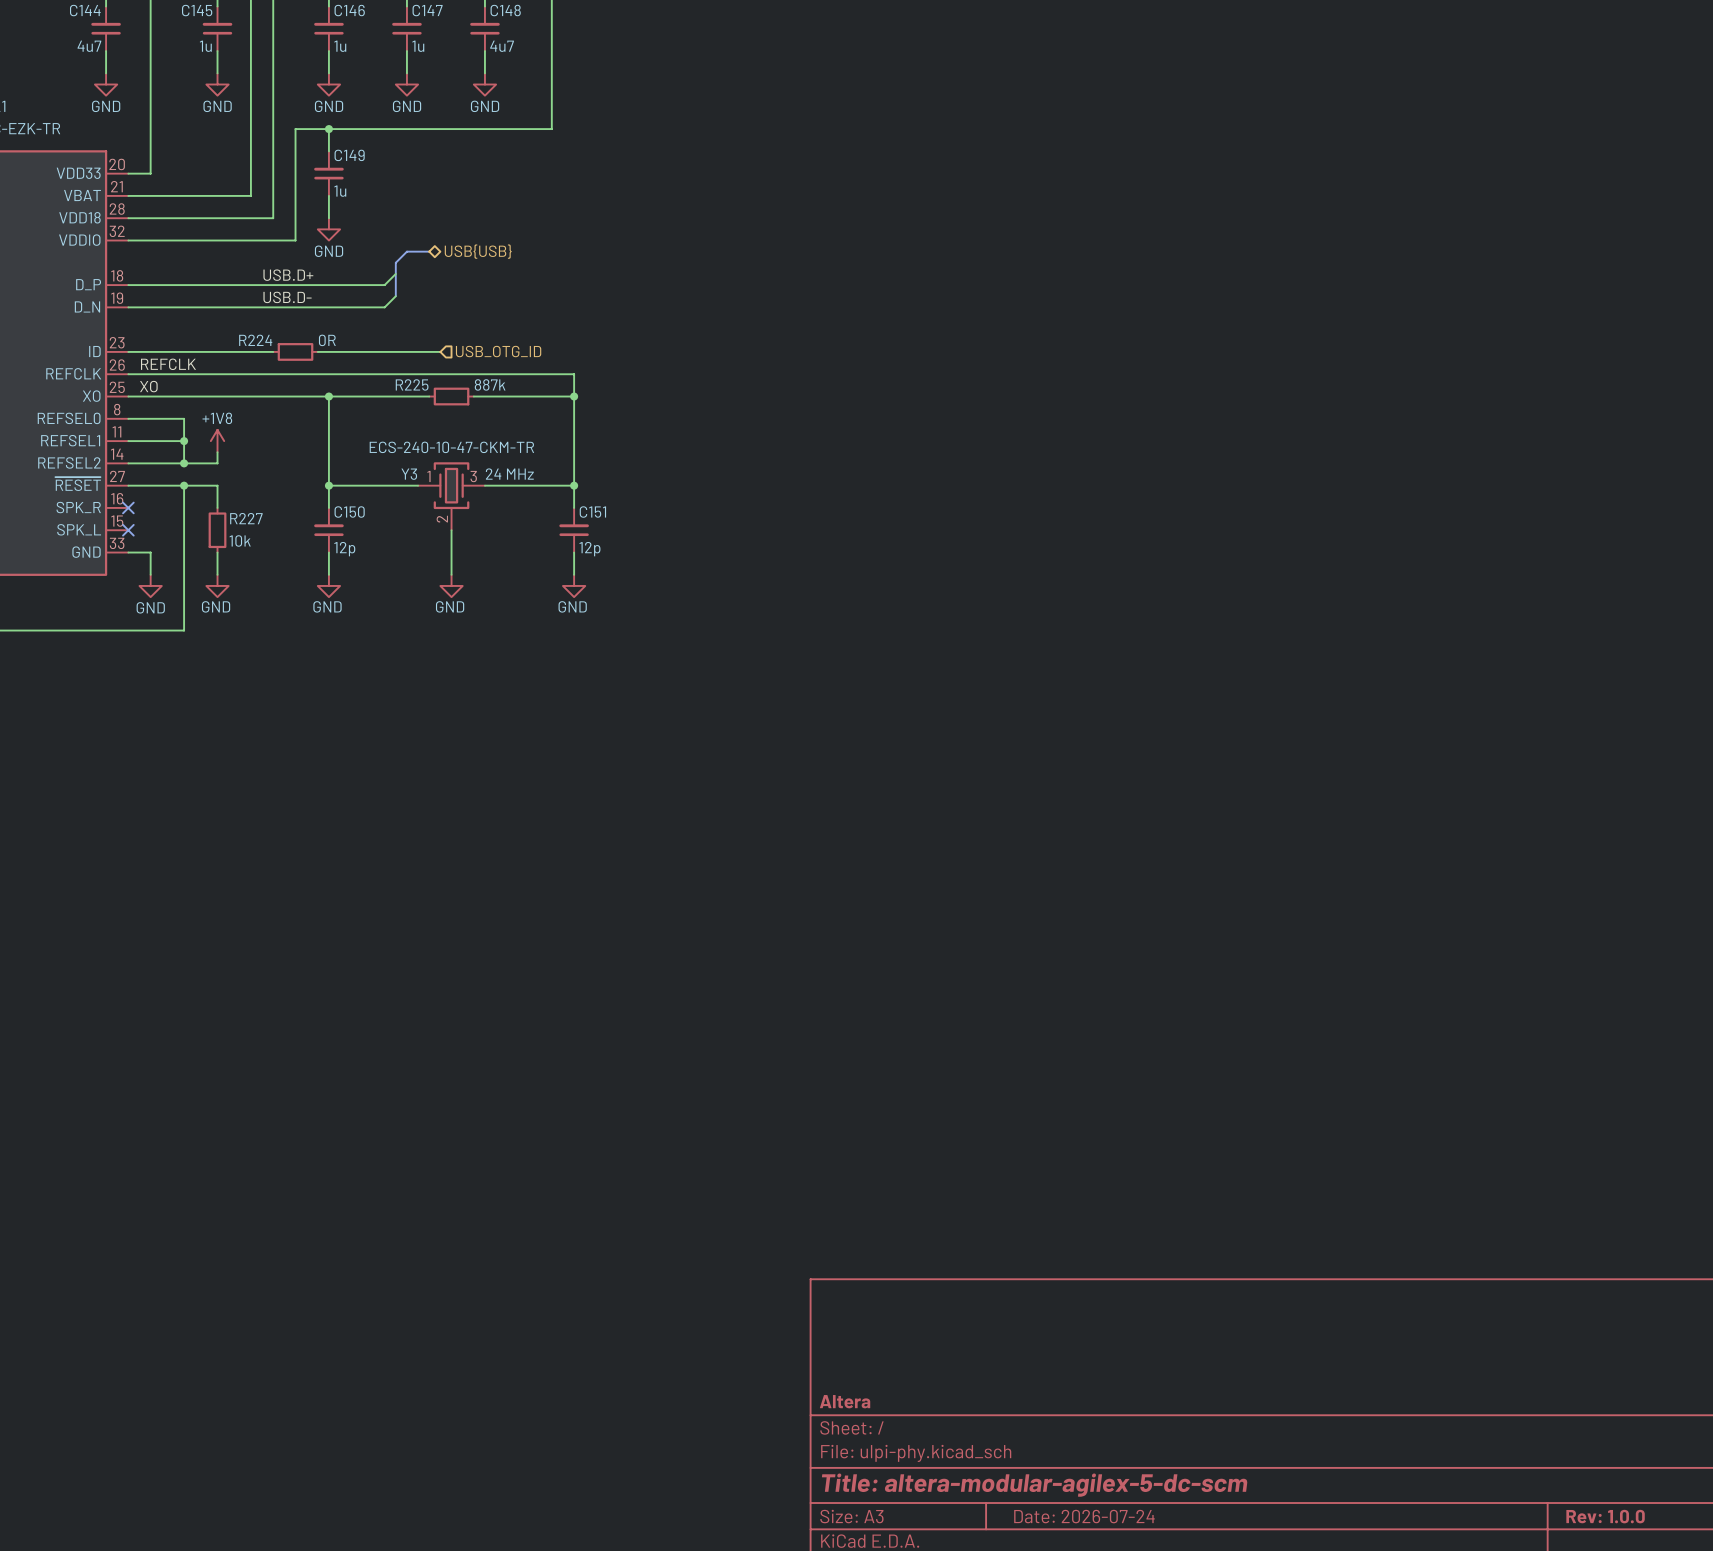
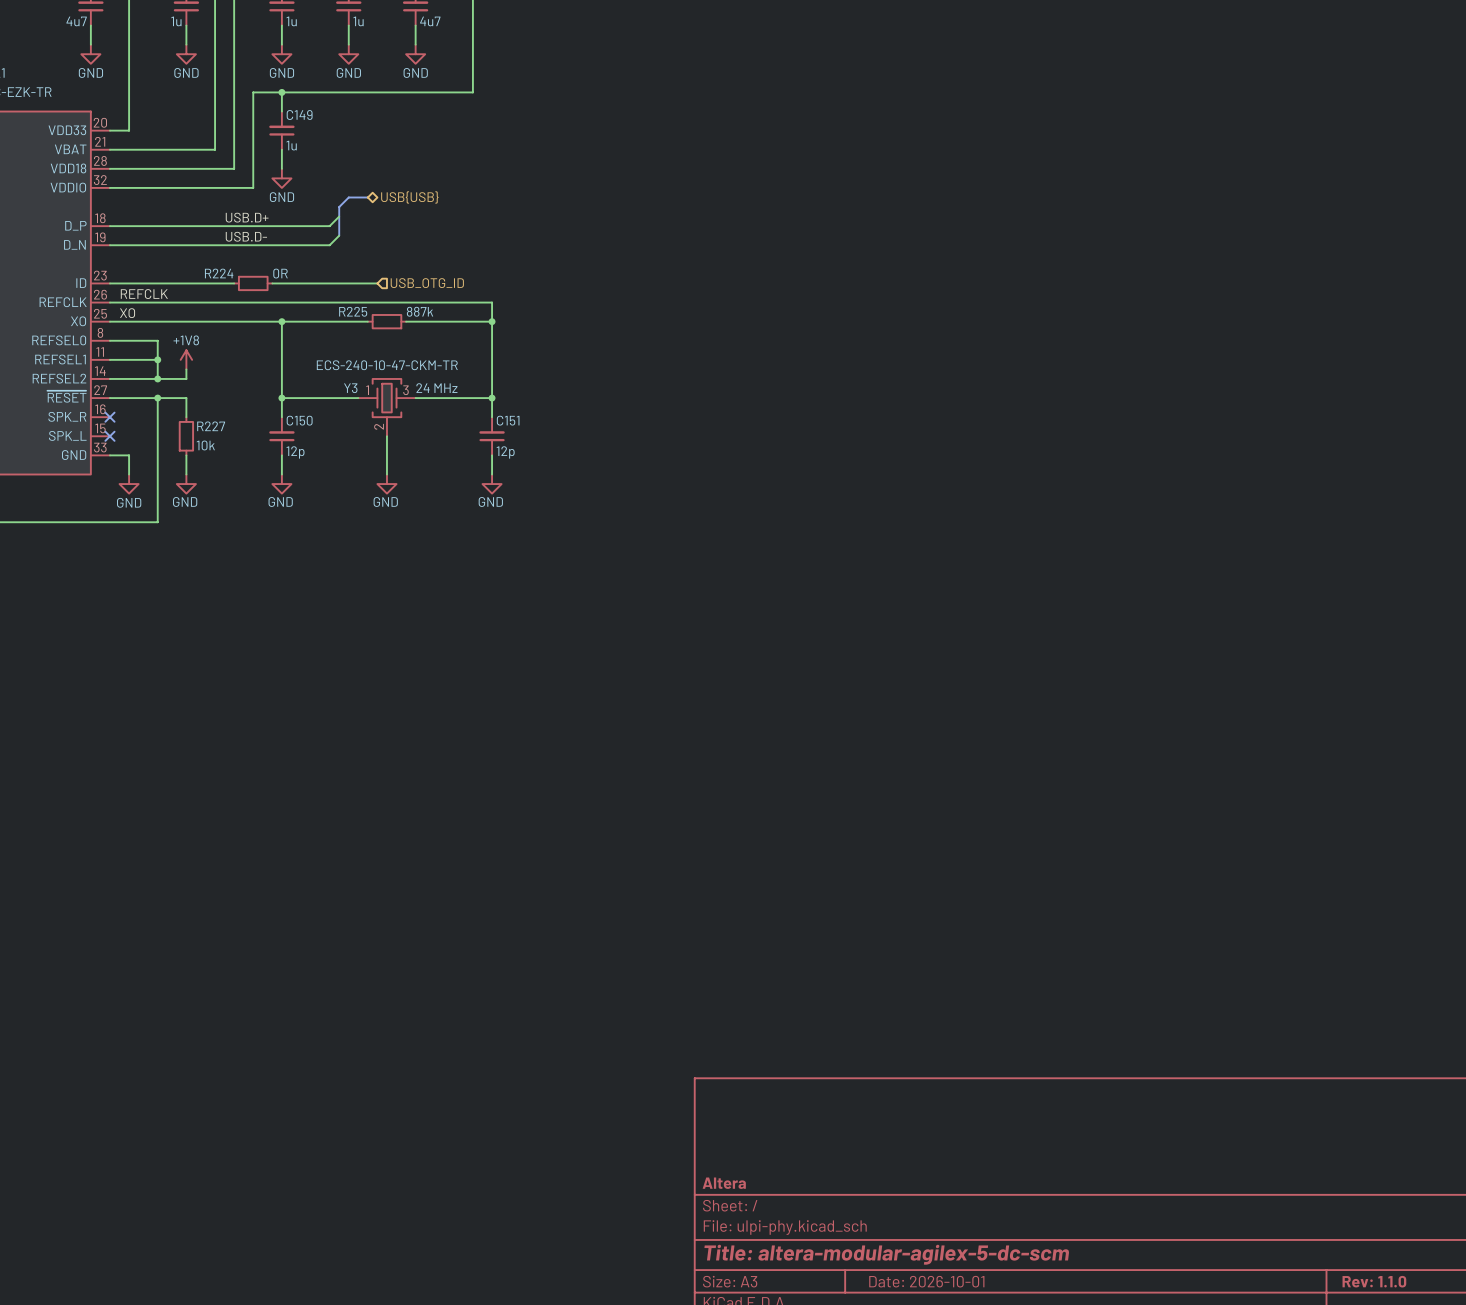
title block: Date: 2026-07-24 (1084, 1516) -> Date: 2026-10-01 (926, 1281)
title block: Rev: 1.0.0 (1605, 1516) -> Rev: 1.1.0 (1374, 1281)

